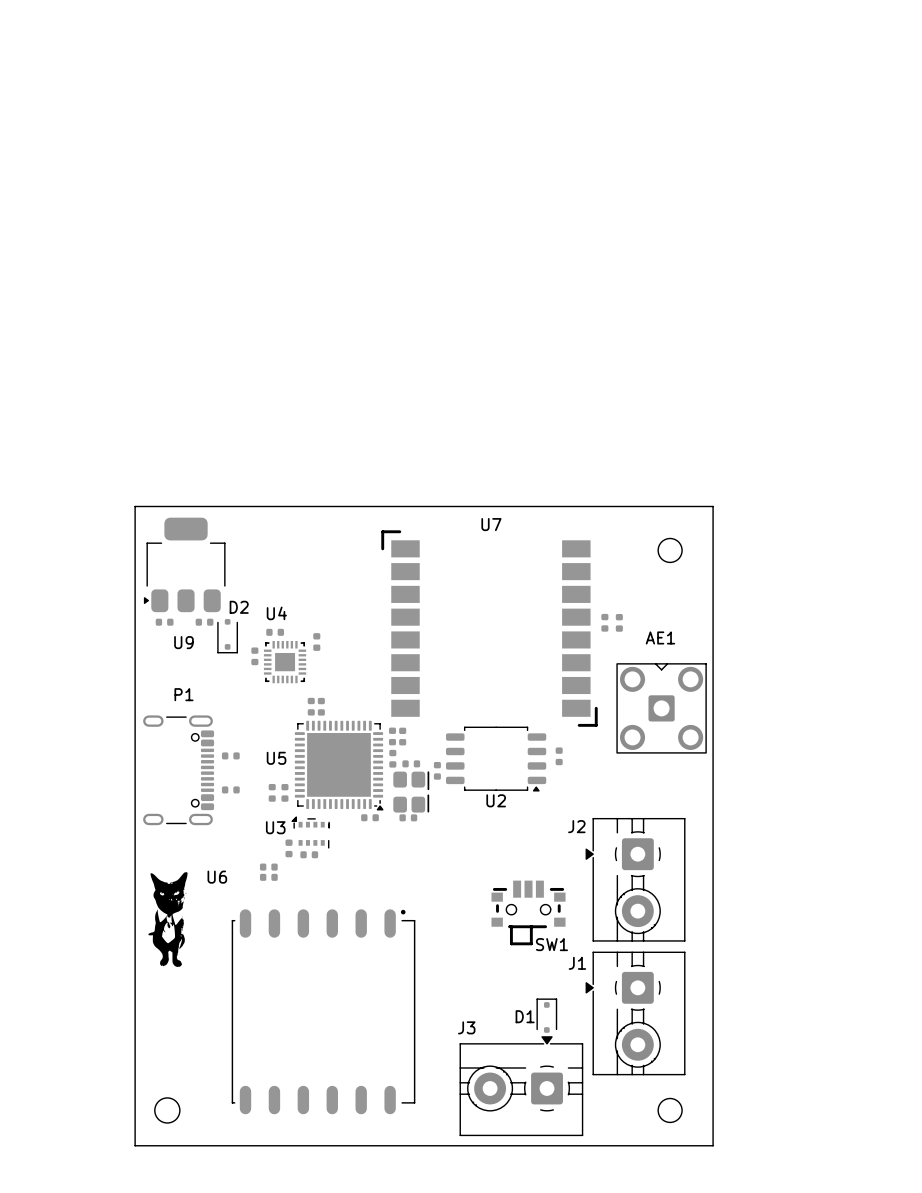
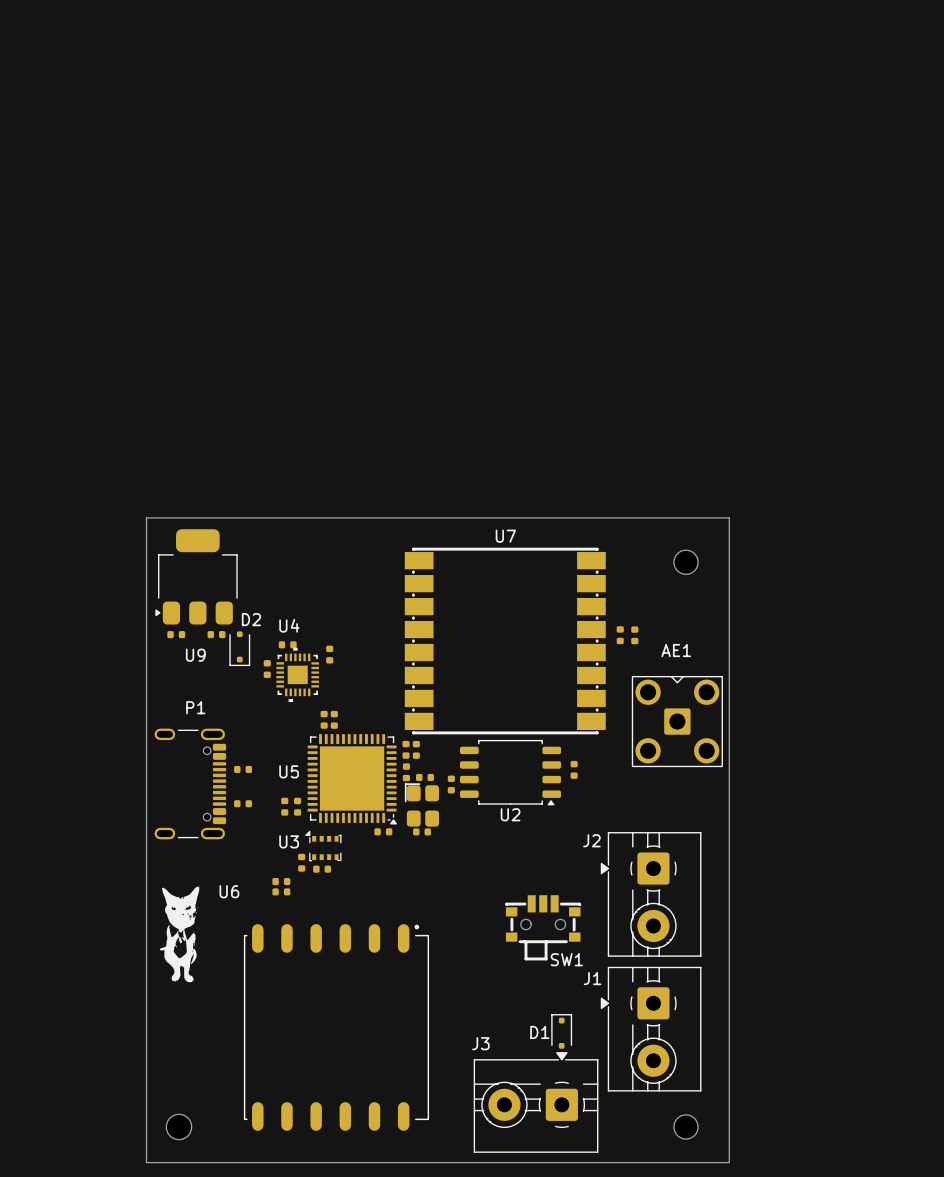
U7 footprint: [381, 530, 598, 727] -> [404, 547, 606, 735]
part footprint: [263, 641, 307, 684] -> [276, 647, 320, 703]
part footprint: [393, 771, 430, 813] -> [404, 783, 440, 827]
U3 footprint: [291, 816, 330, 849] -> [305, 830, 342, 862]
SW1 footprint: [491, 880, 566, 946] -> [505, 895, 582, 961]

